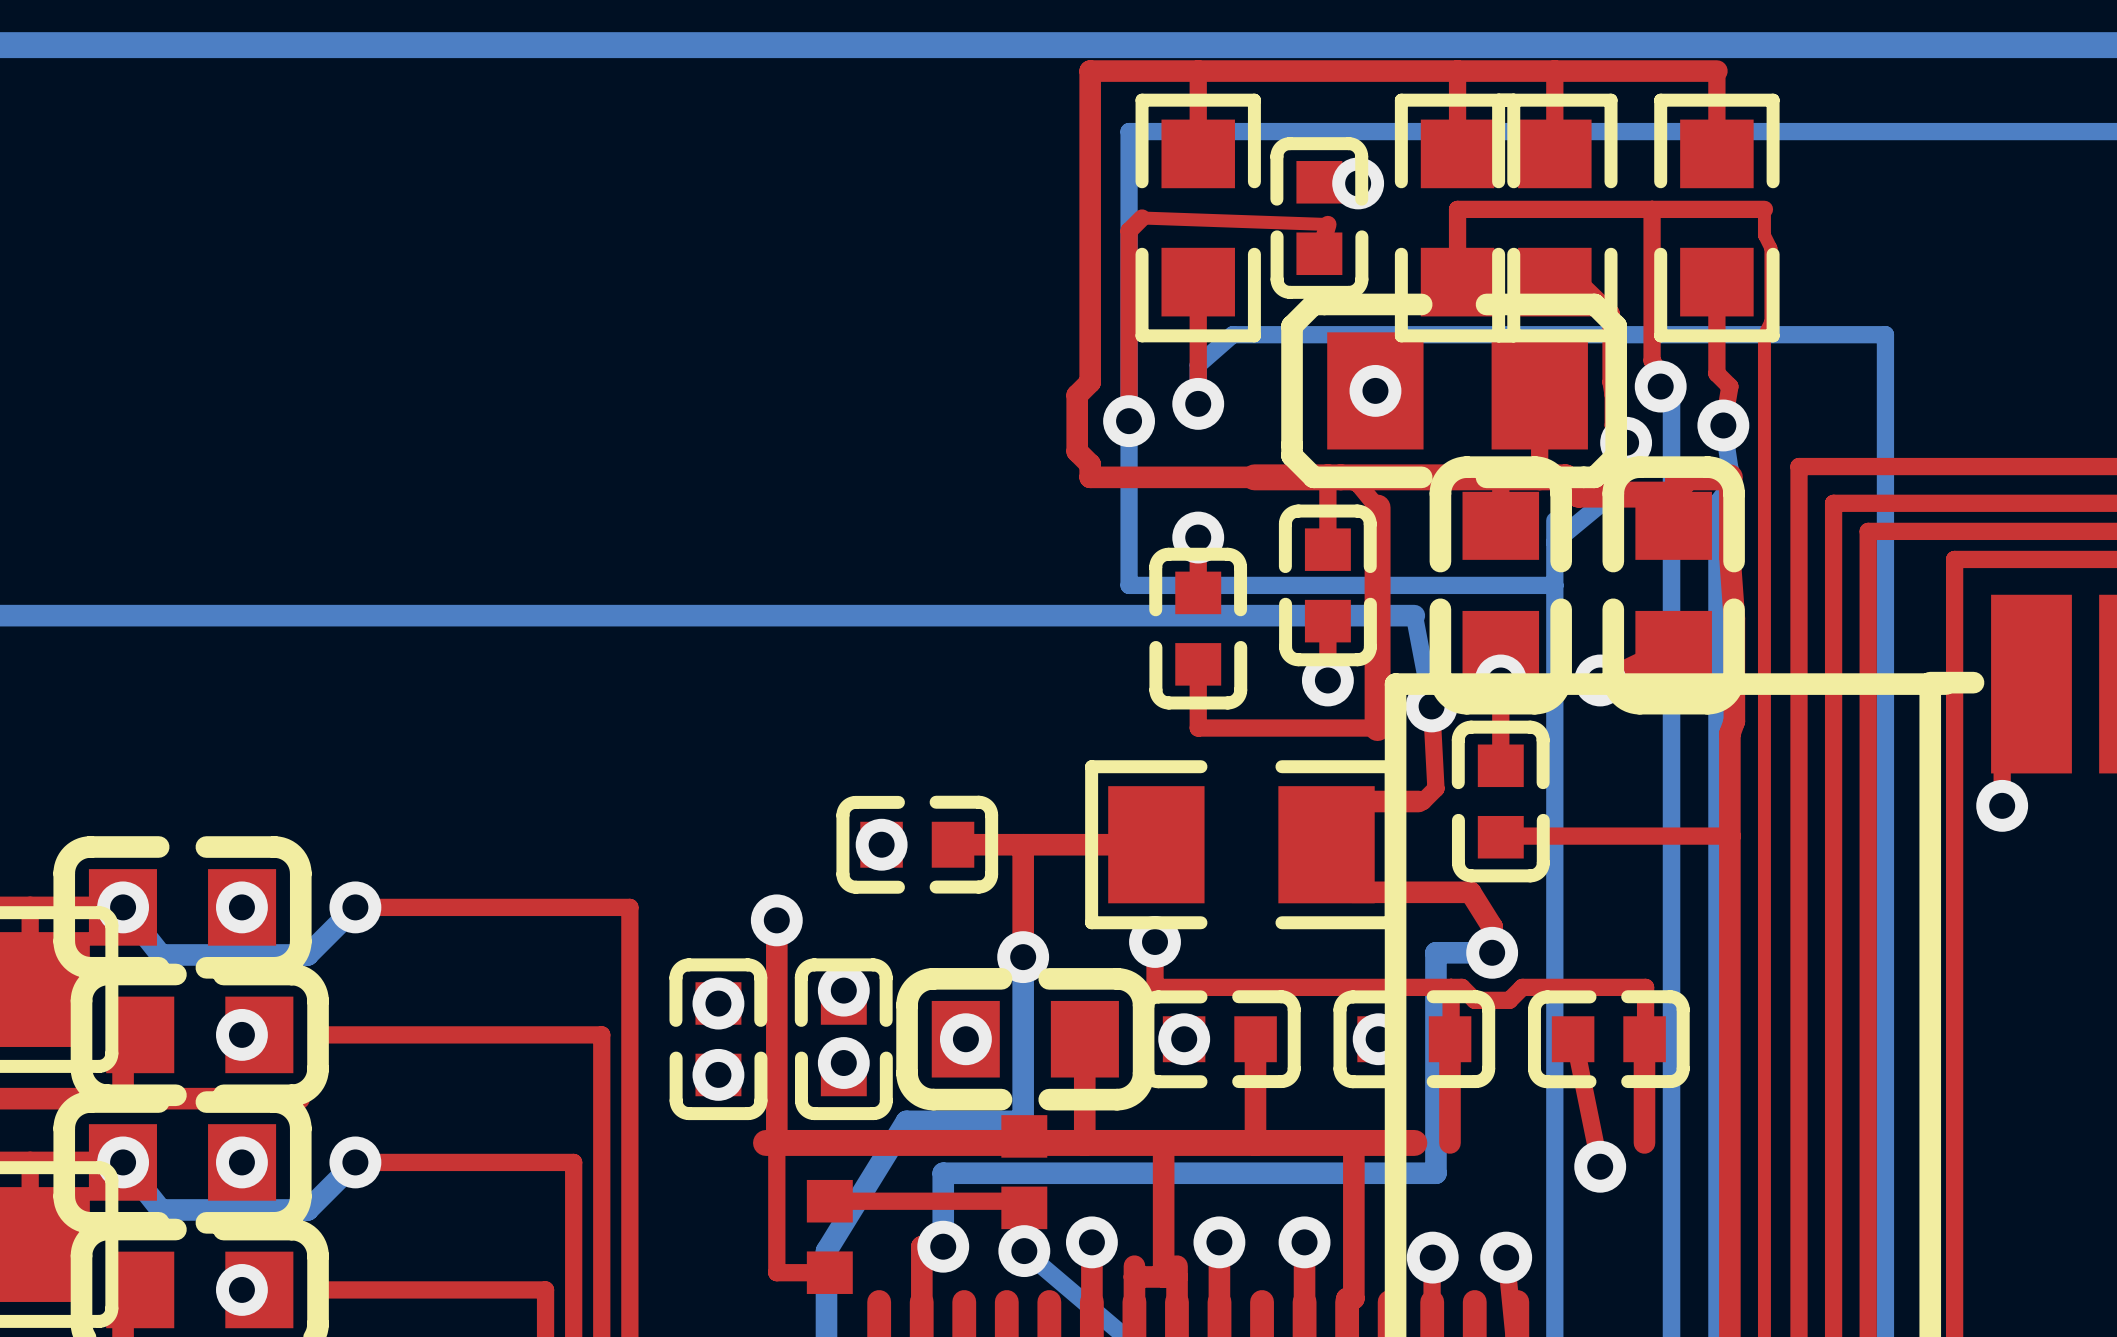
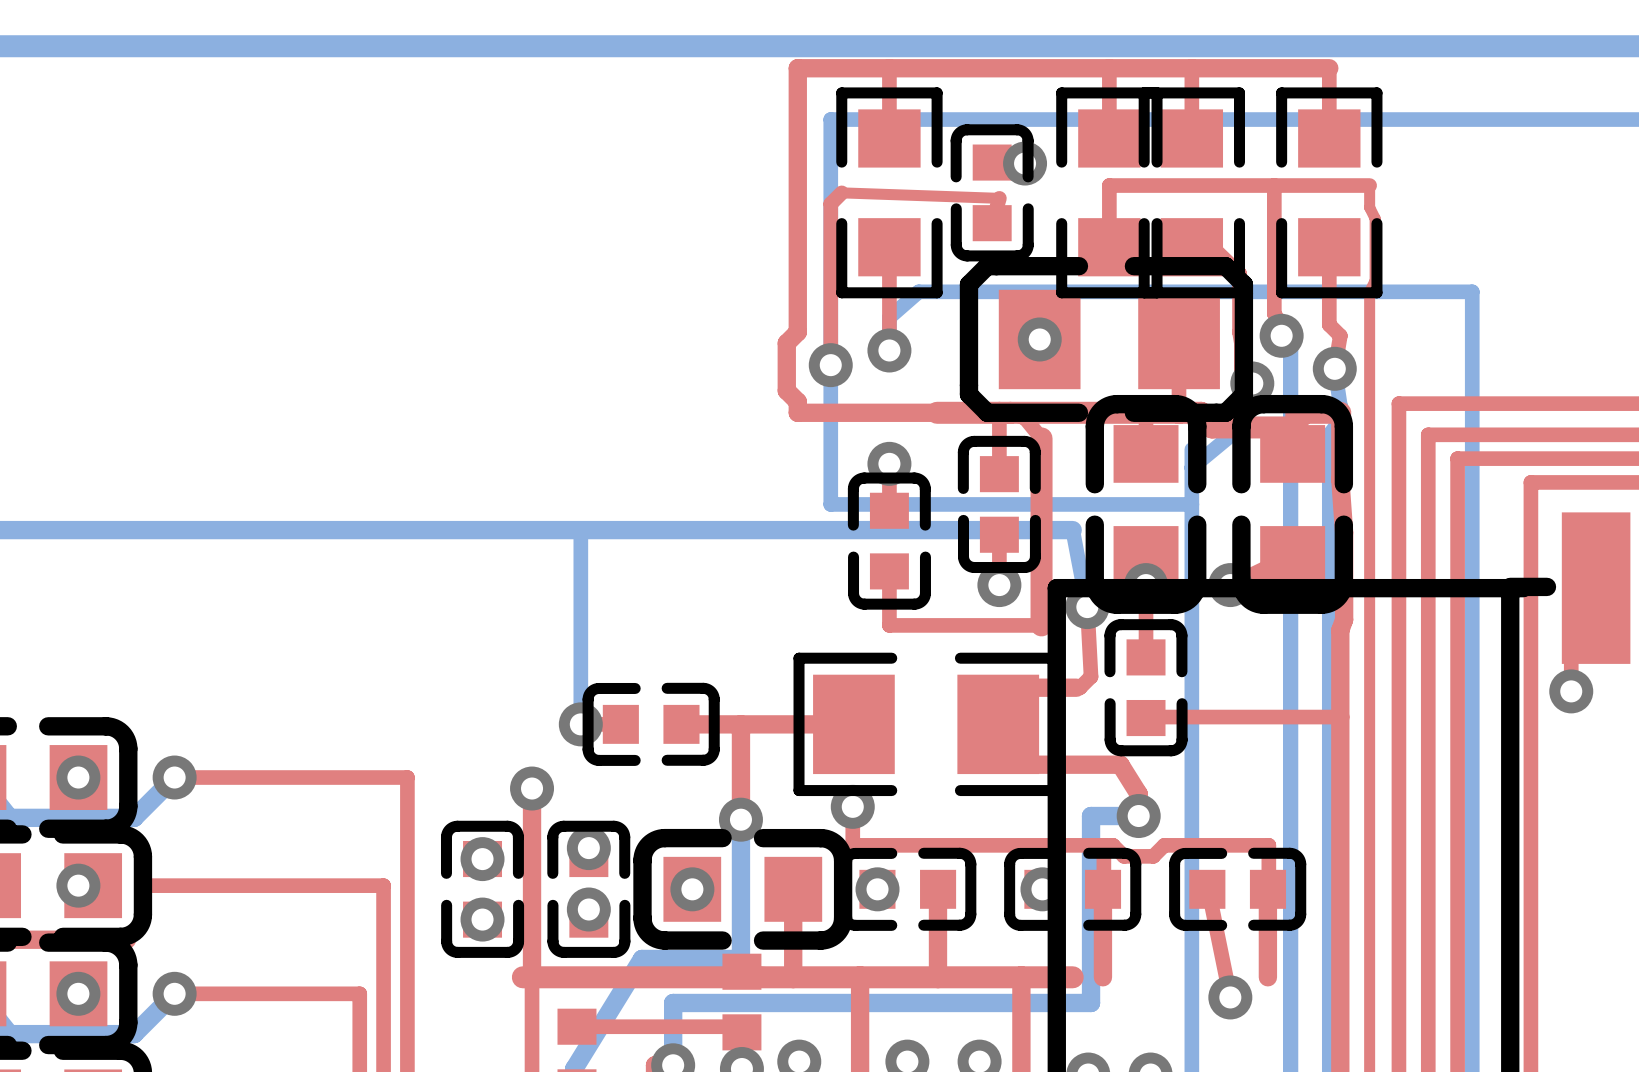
bottom track: none -> (580, 530) (580, 724)
via position: (881, 844) -> (580, 724)

